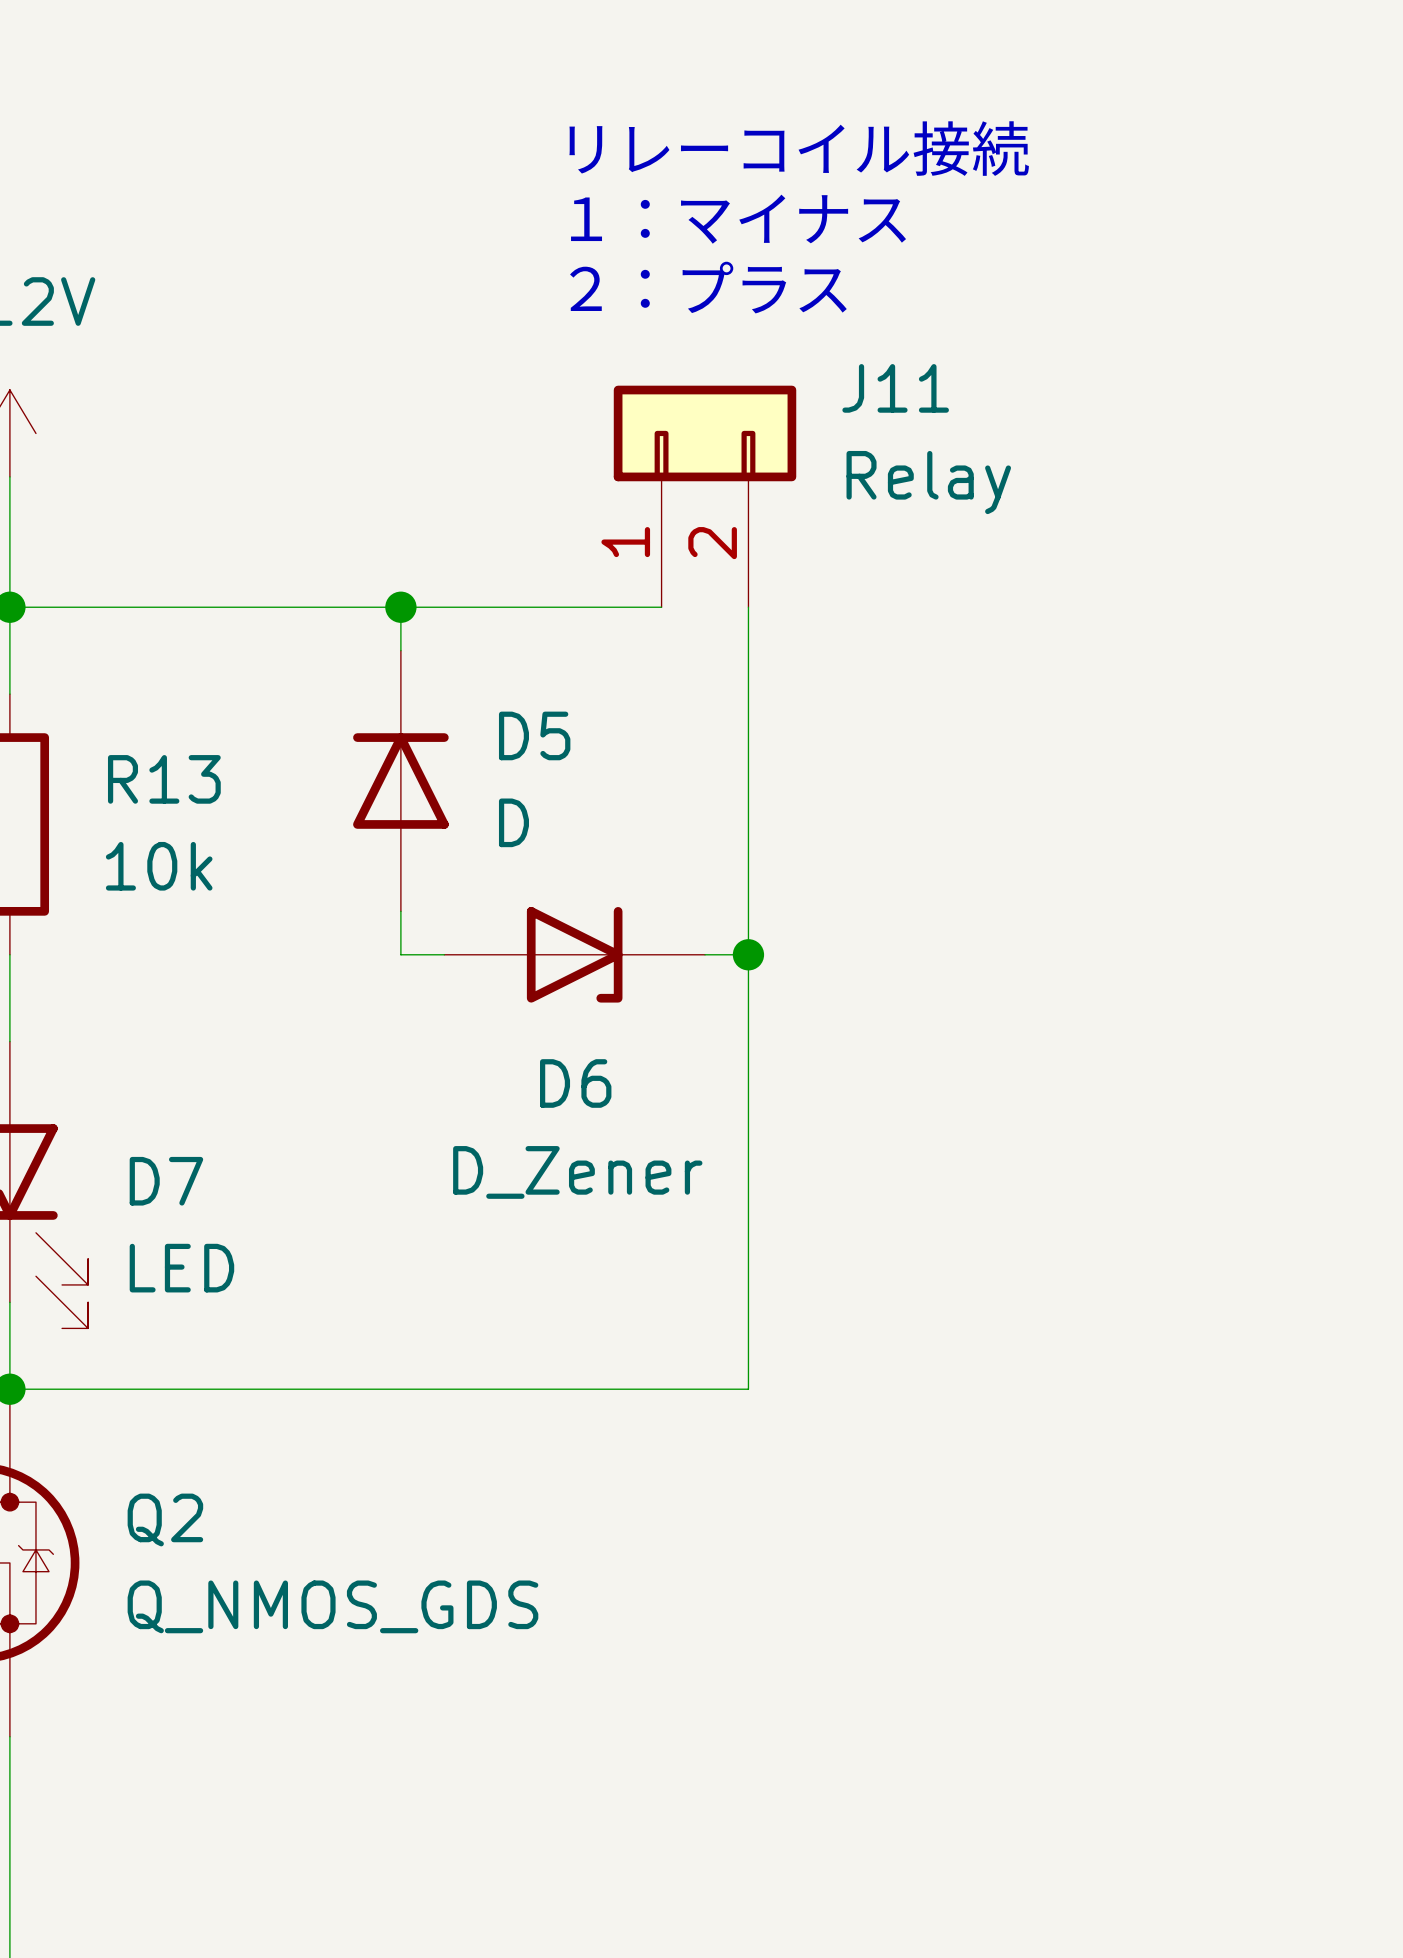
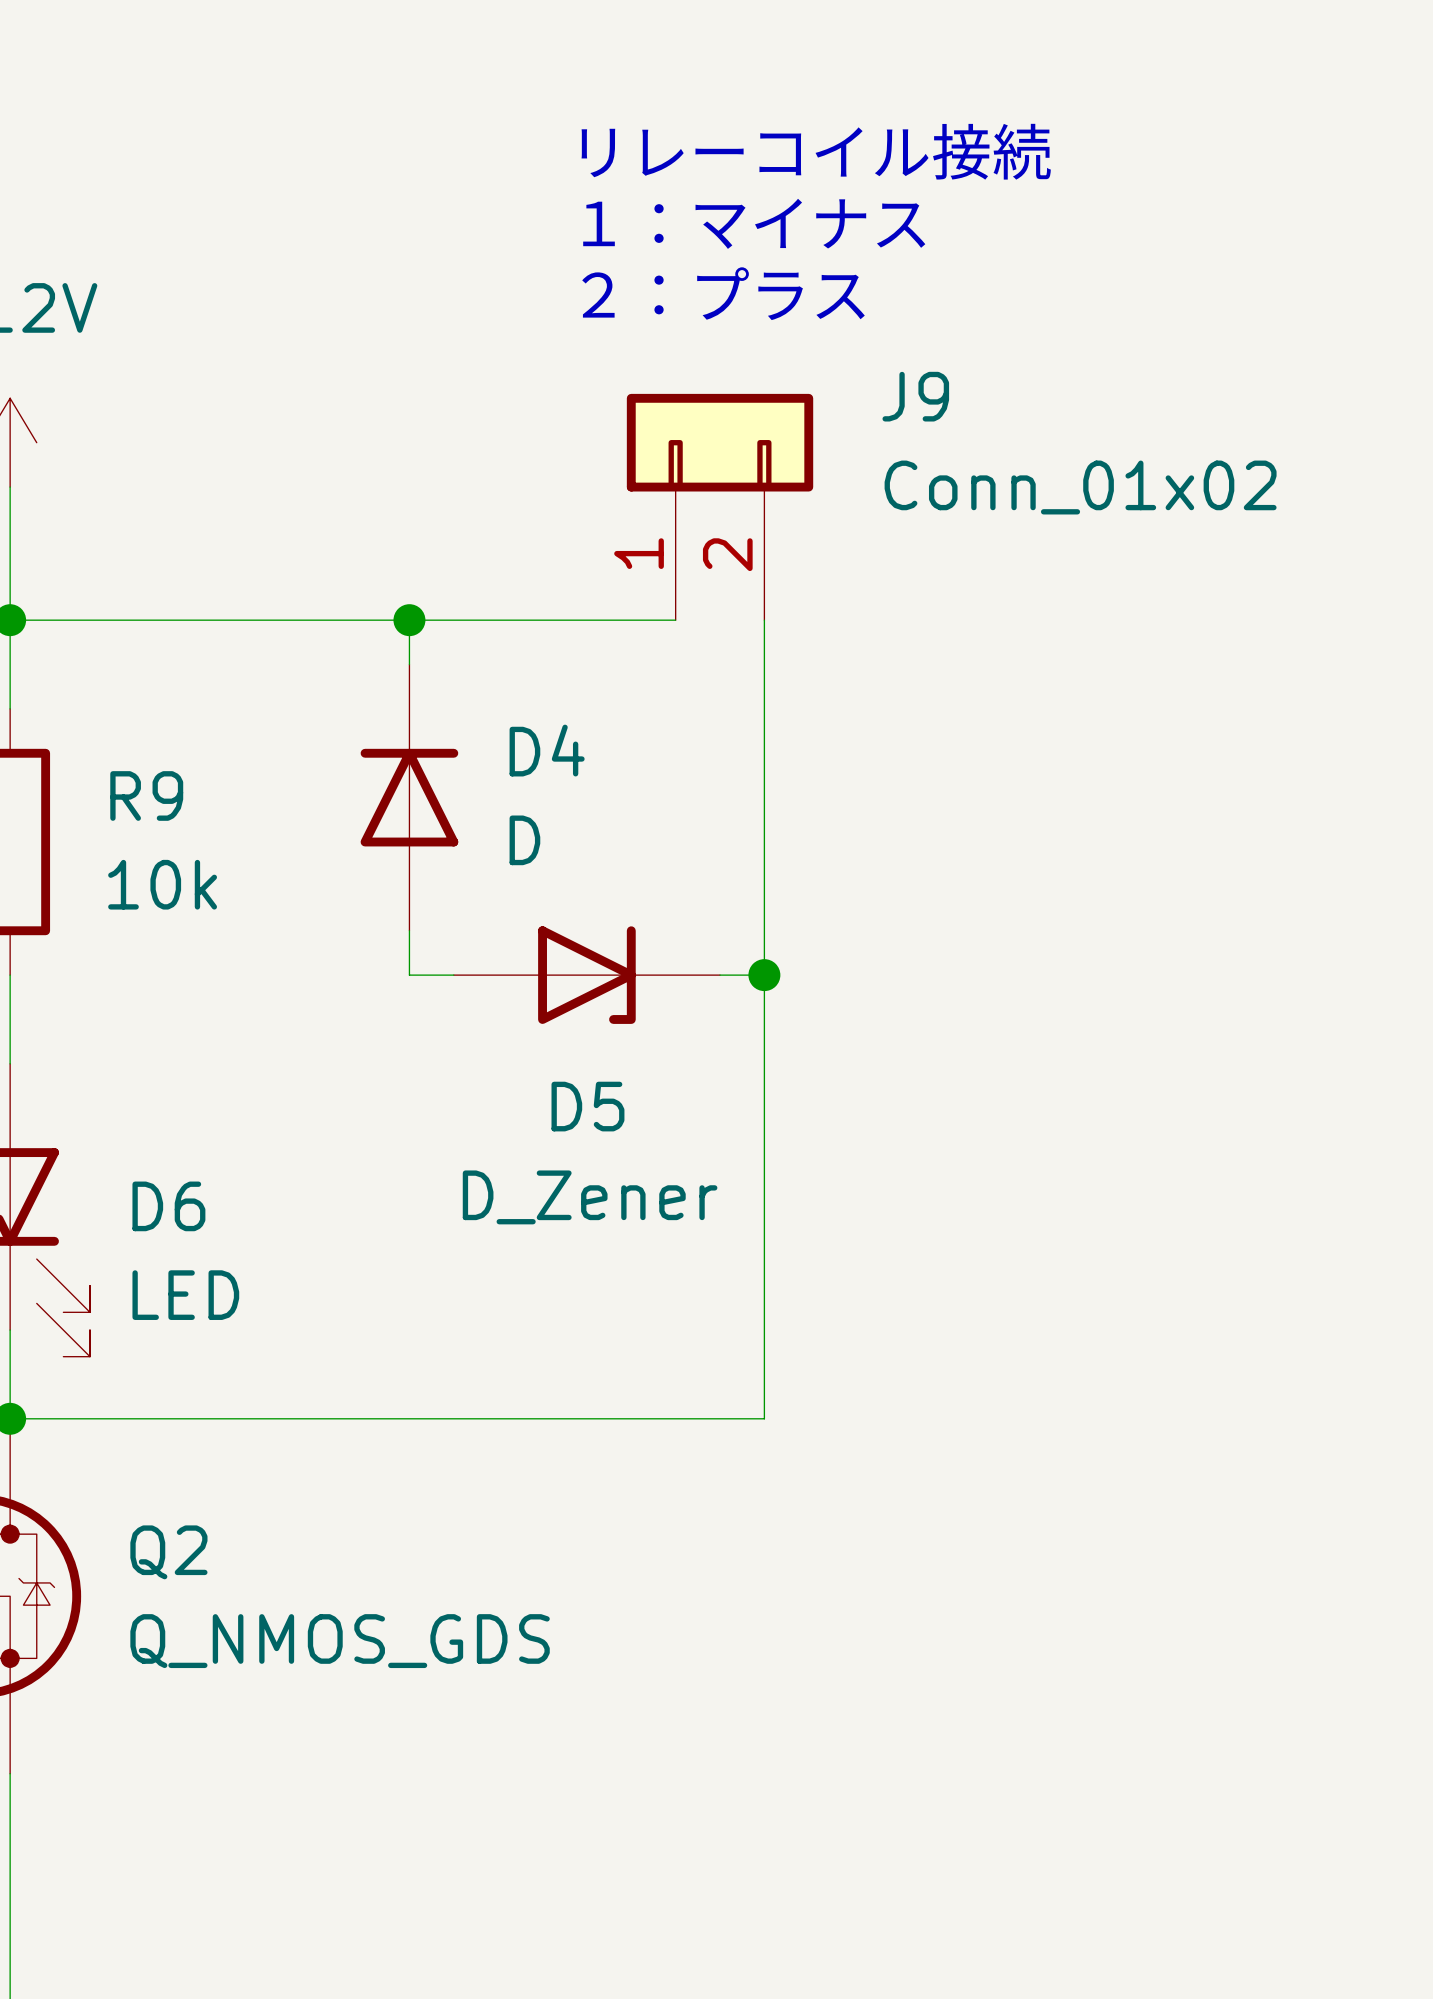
J11 name: J11 (895, 388) -> J9 (915, 396)
J11 value: Relay (928, 482) -> Conn_01x02 (1080, 487)
D5 name: D5 (534, 735) -> D4 (547, 750)
R13 name: R13 (164, 779) -> R9 (146, 795)
D6 name: D6 (575, 1083) -> D5 (587, 1106)
D7 name: D7 (166, 1181) -> D6 (168, 1206)

